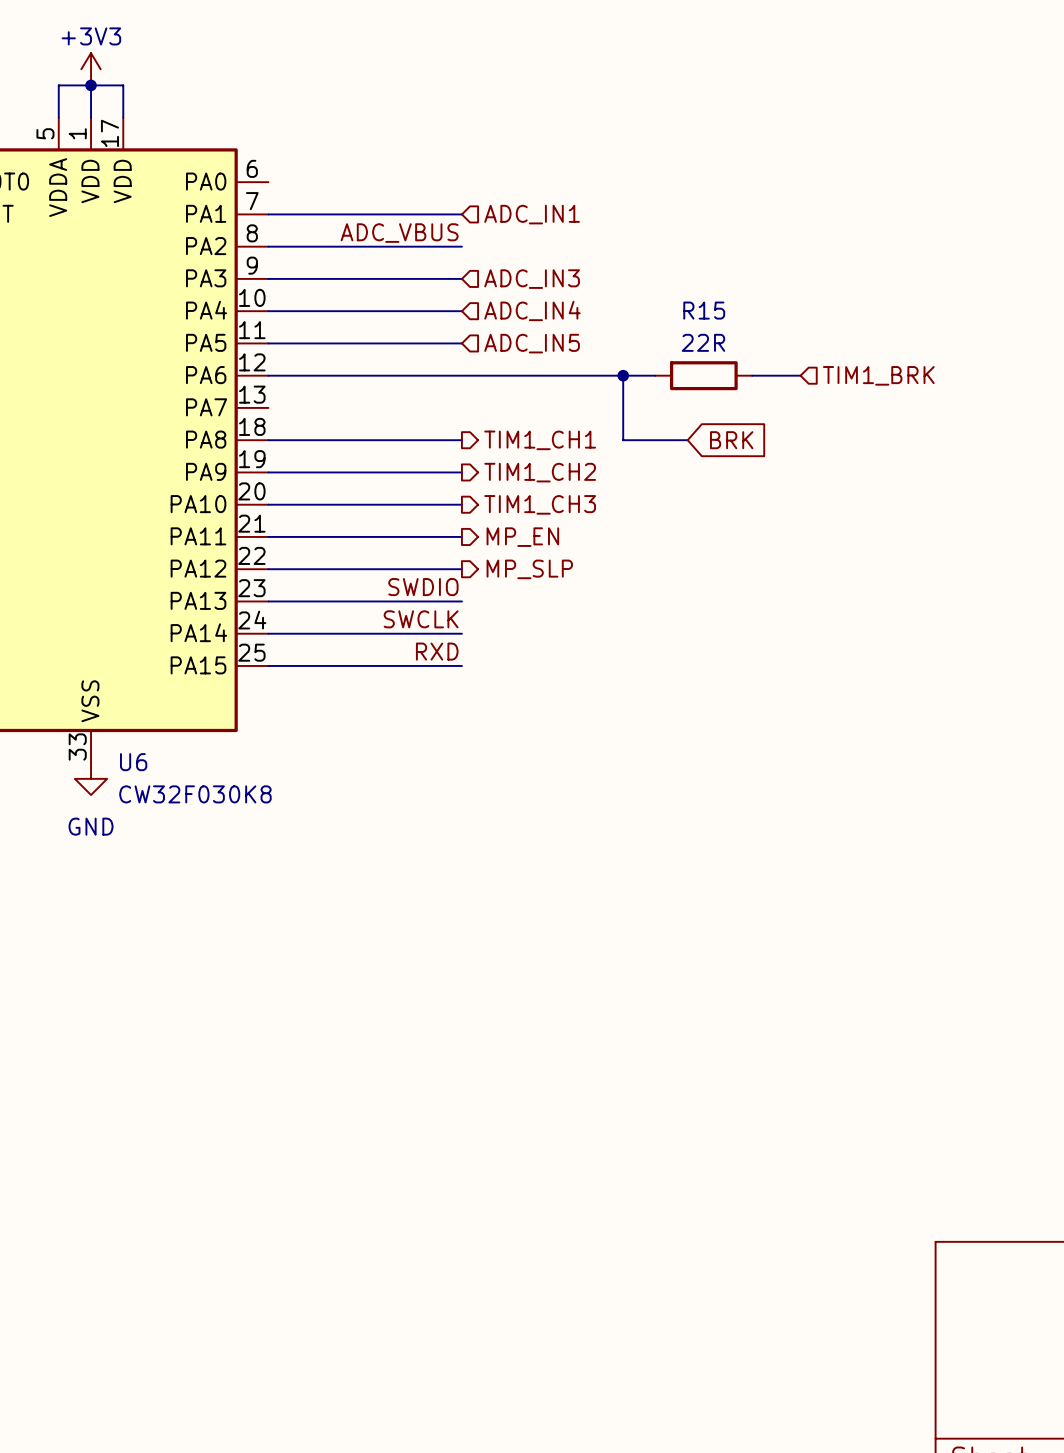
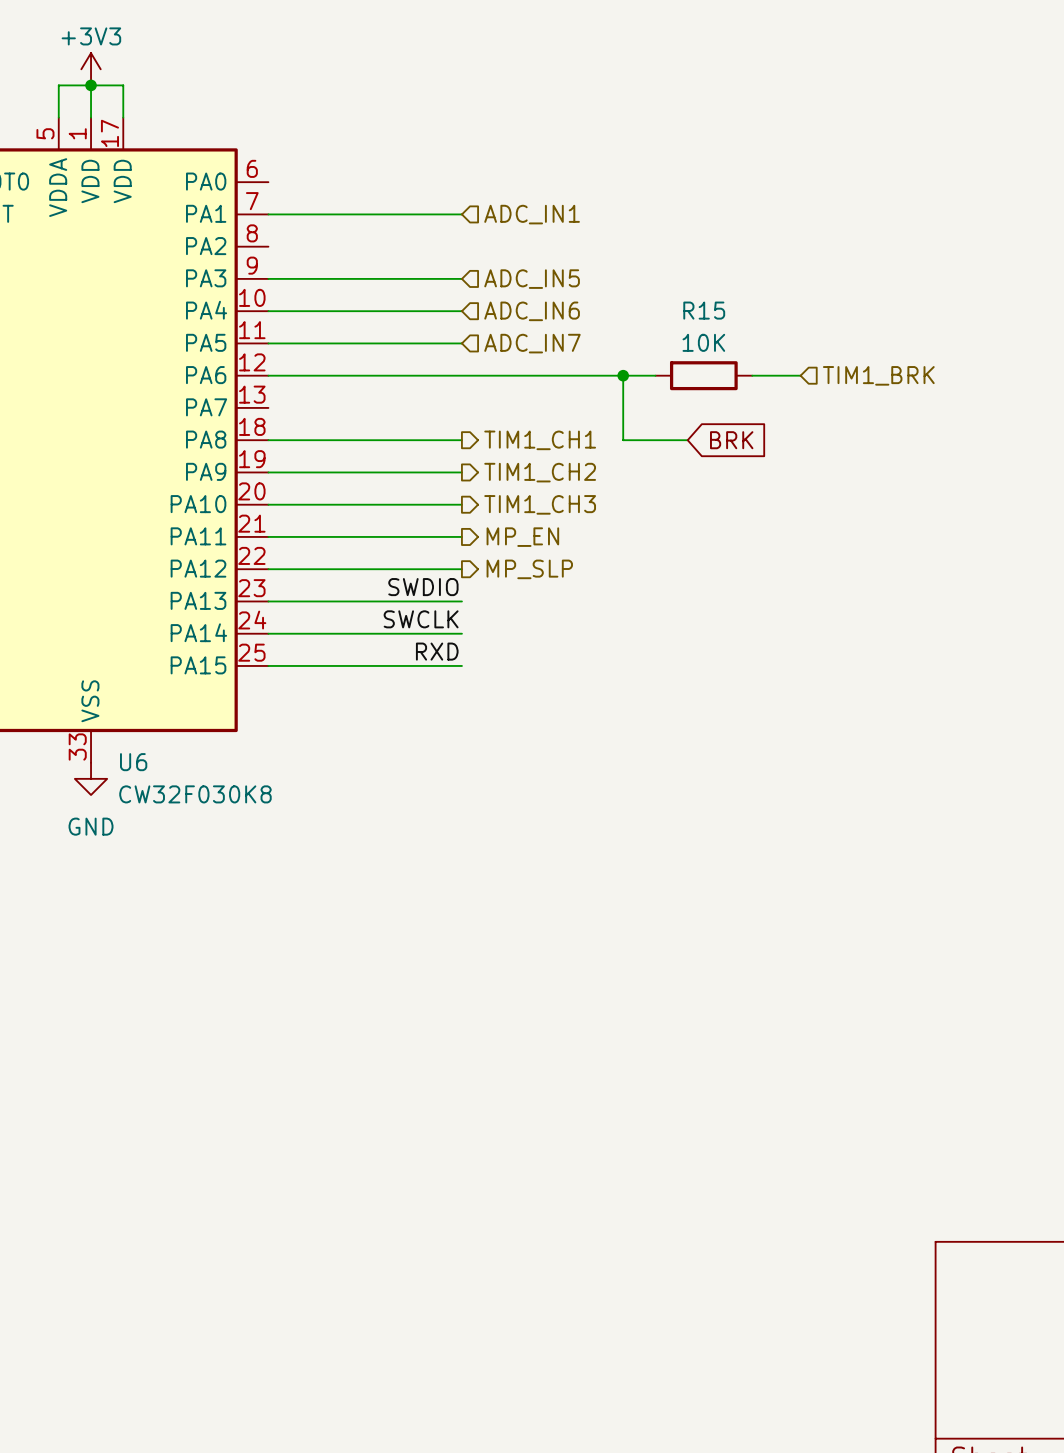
label: ADC_VBUS (399, 233) -> none
wire: (268, 246) (461, 246) -> none
hierarchical label: ADC_IN3 (532, 279) -> ADC_IN5 (532, 279)
hierarchical label: ADC_IN4 (532, 310) -> ADC_IN6 (532, 311)
R15 value: 22R (703, 342) -> 10K (703, 342)
hierarchical label: ADC_IN5 (532, 343) -> ADC_IN7 (532, 343)

